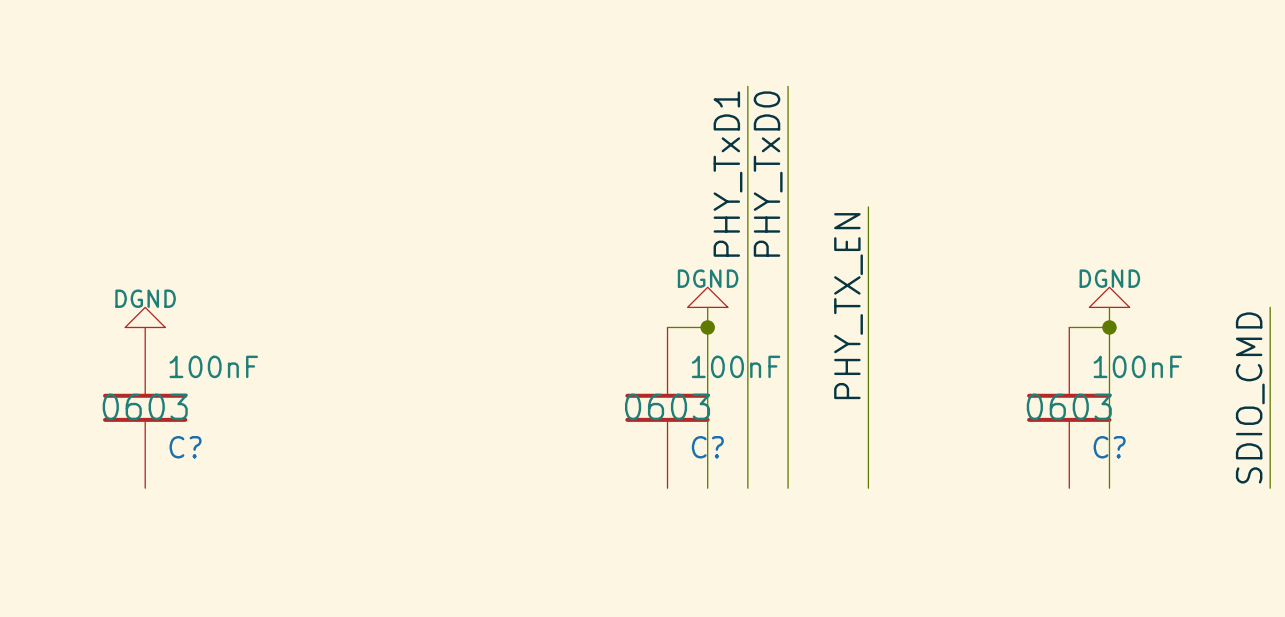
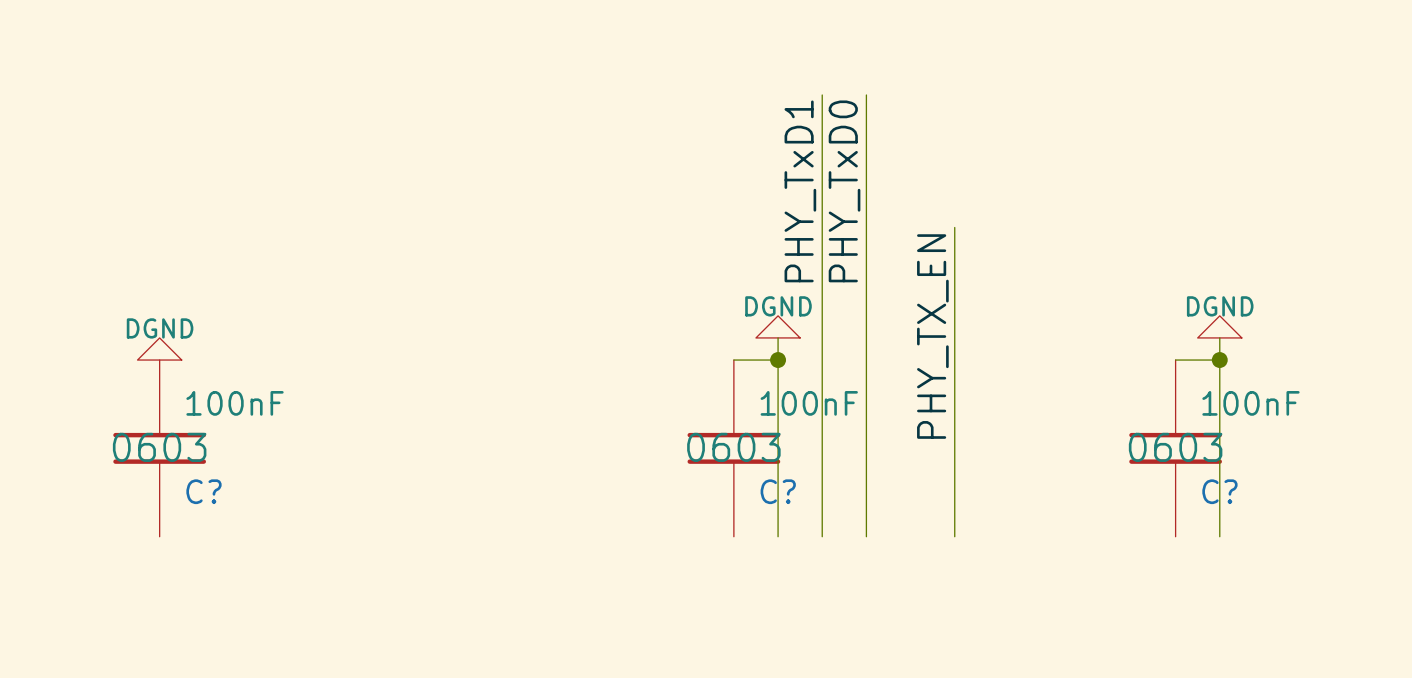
wire: (1270, 307) (1270, 488) -> none
label: SDIO_CMD (1250, 397) -> none

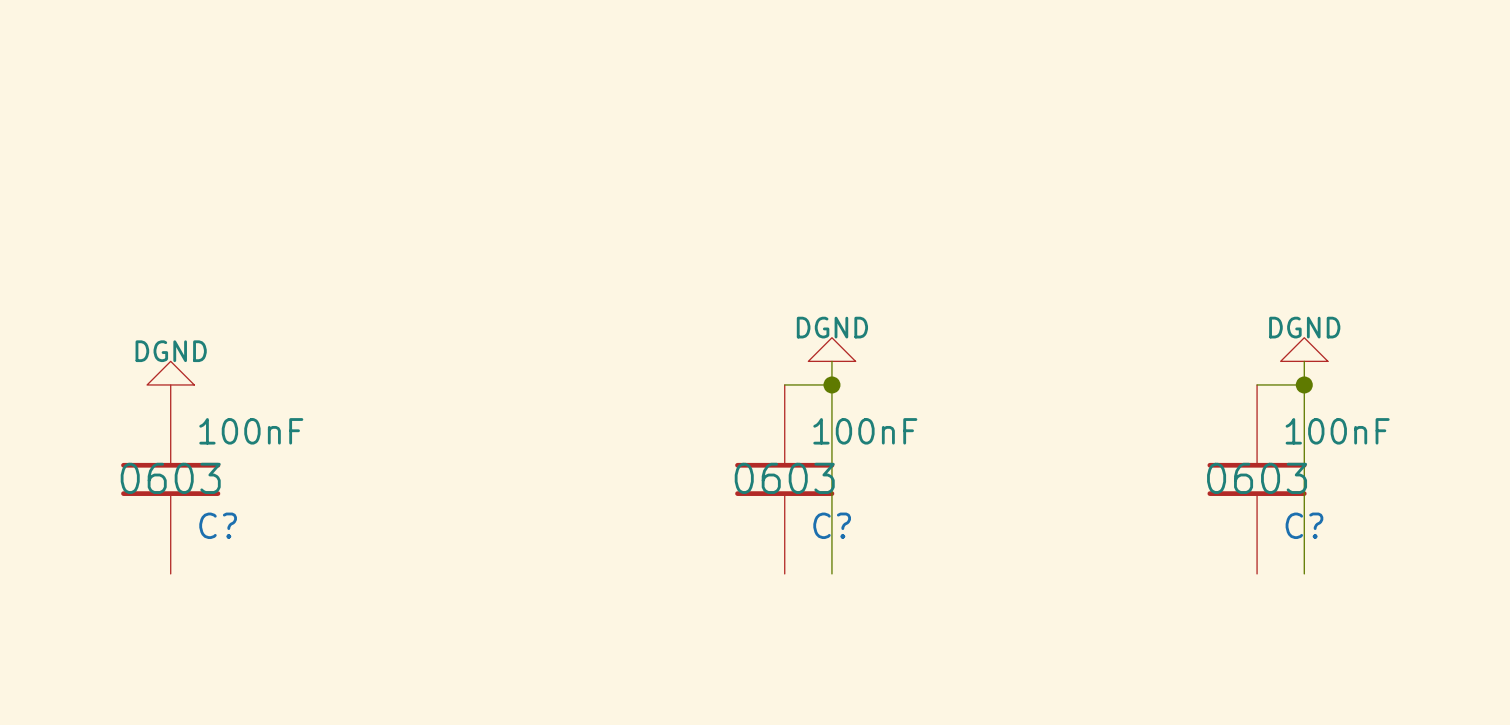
wire: (822, 95) (822, 536) -> none
wire: (866, 95) (866, 536) -> none
label: PHY_TxD1 (800, 191) -> none
label: PHY_TxD0 (844, 191) -> none
wire: (954, 227) (954, 536) -> none
label: PHY_TX_EN (932, 336) -> none

